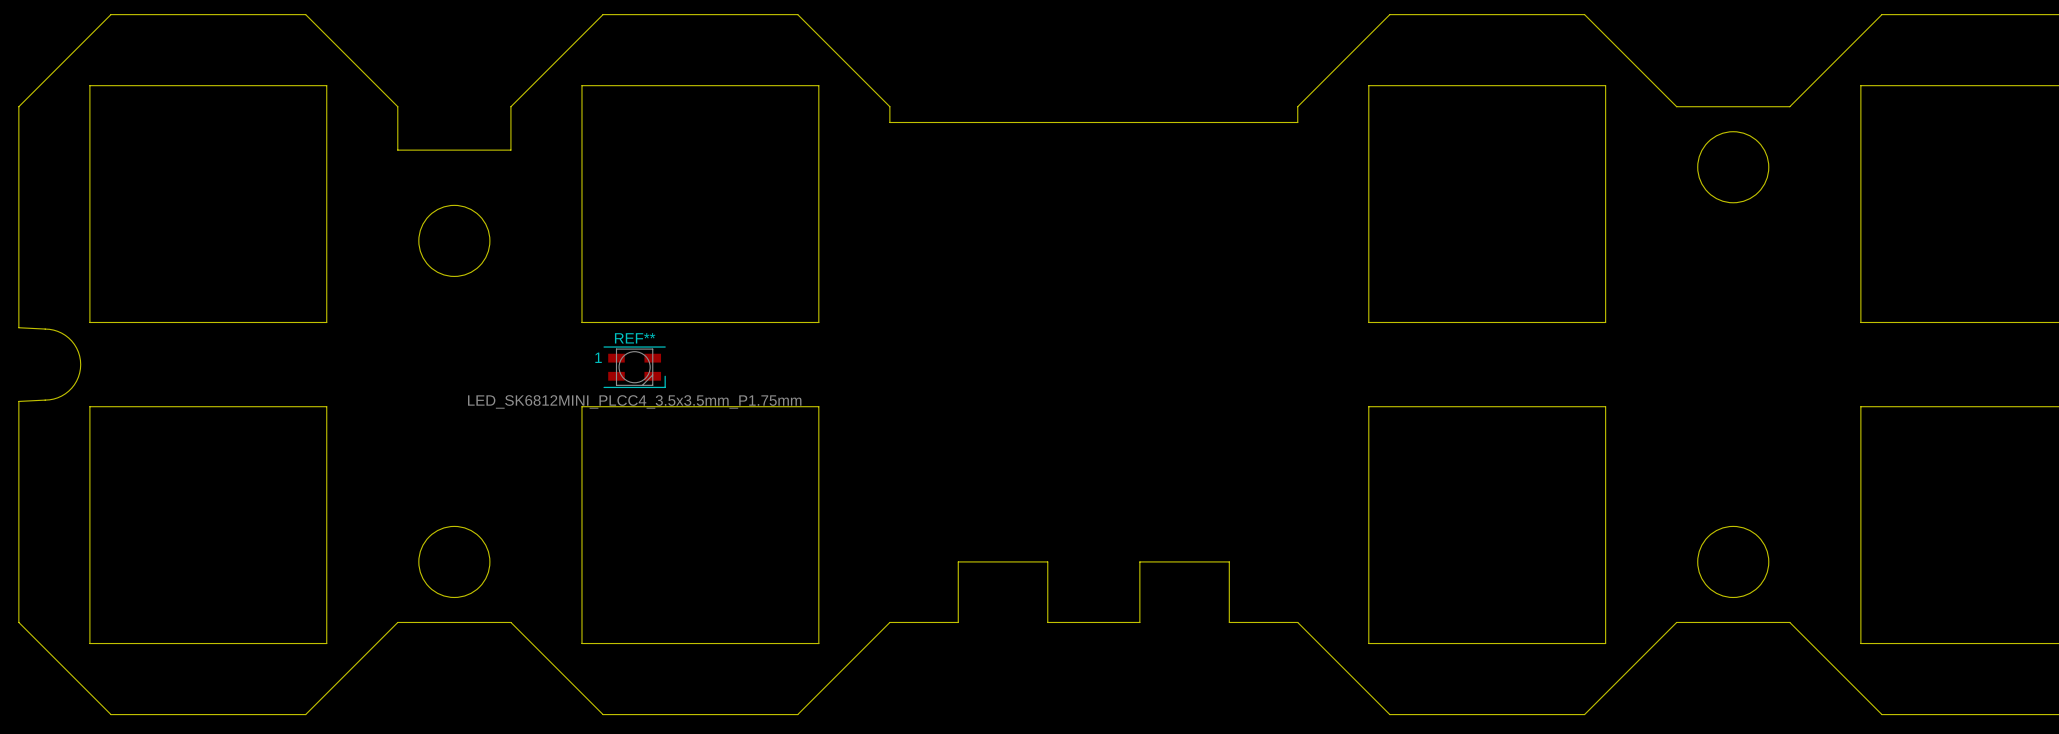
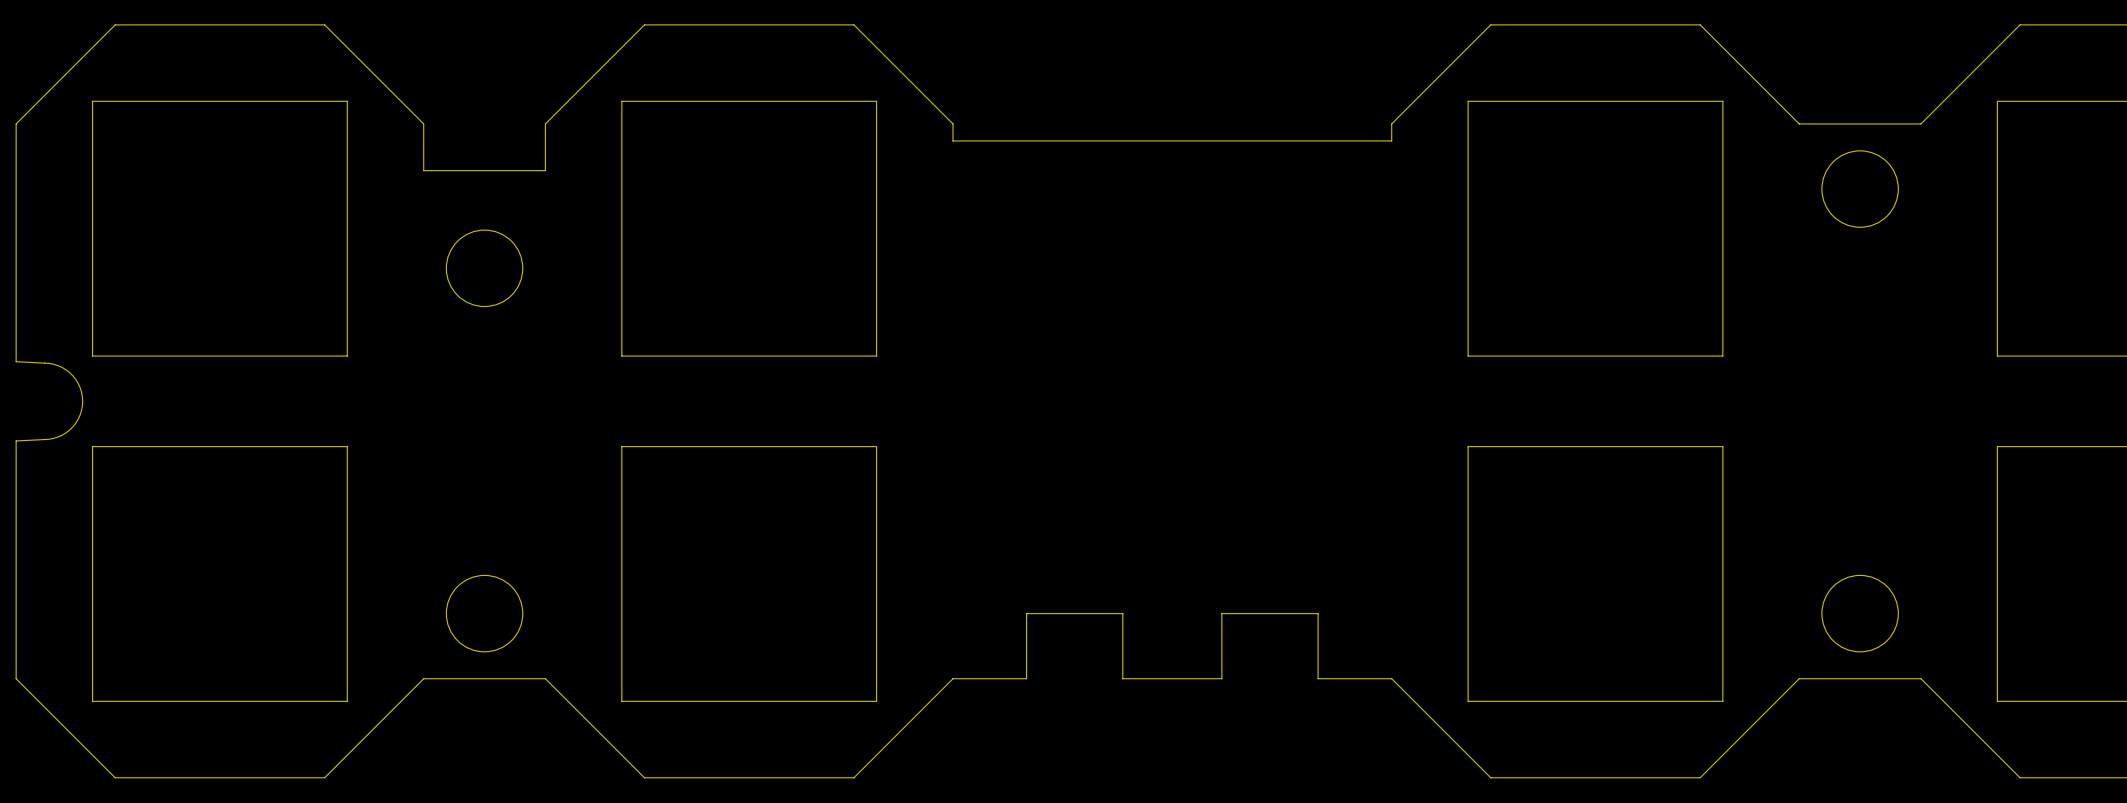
REF**: LED_SK6812MINI_PLCC4_3.5x3.5mm_P1.75mm (634, 367) -> none

